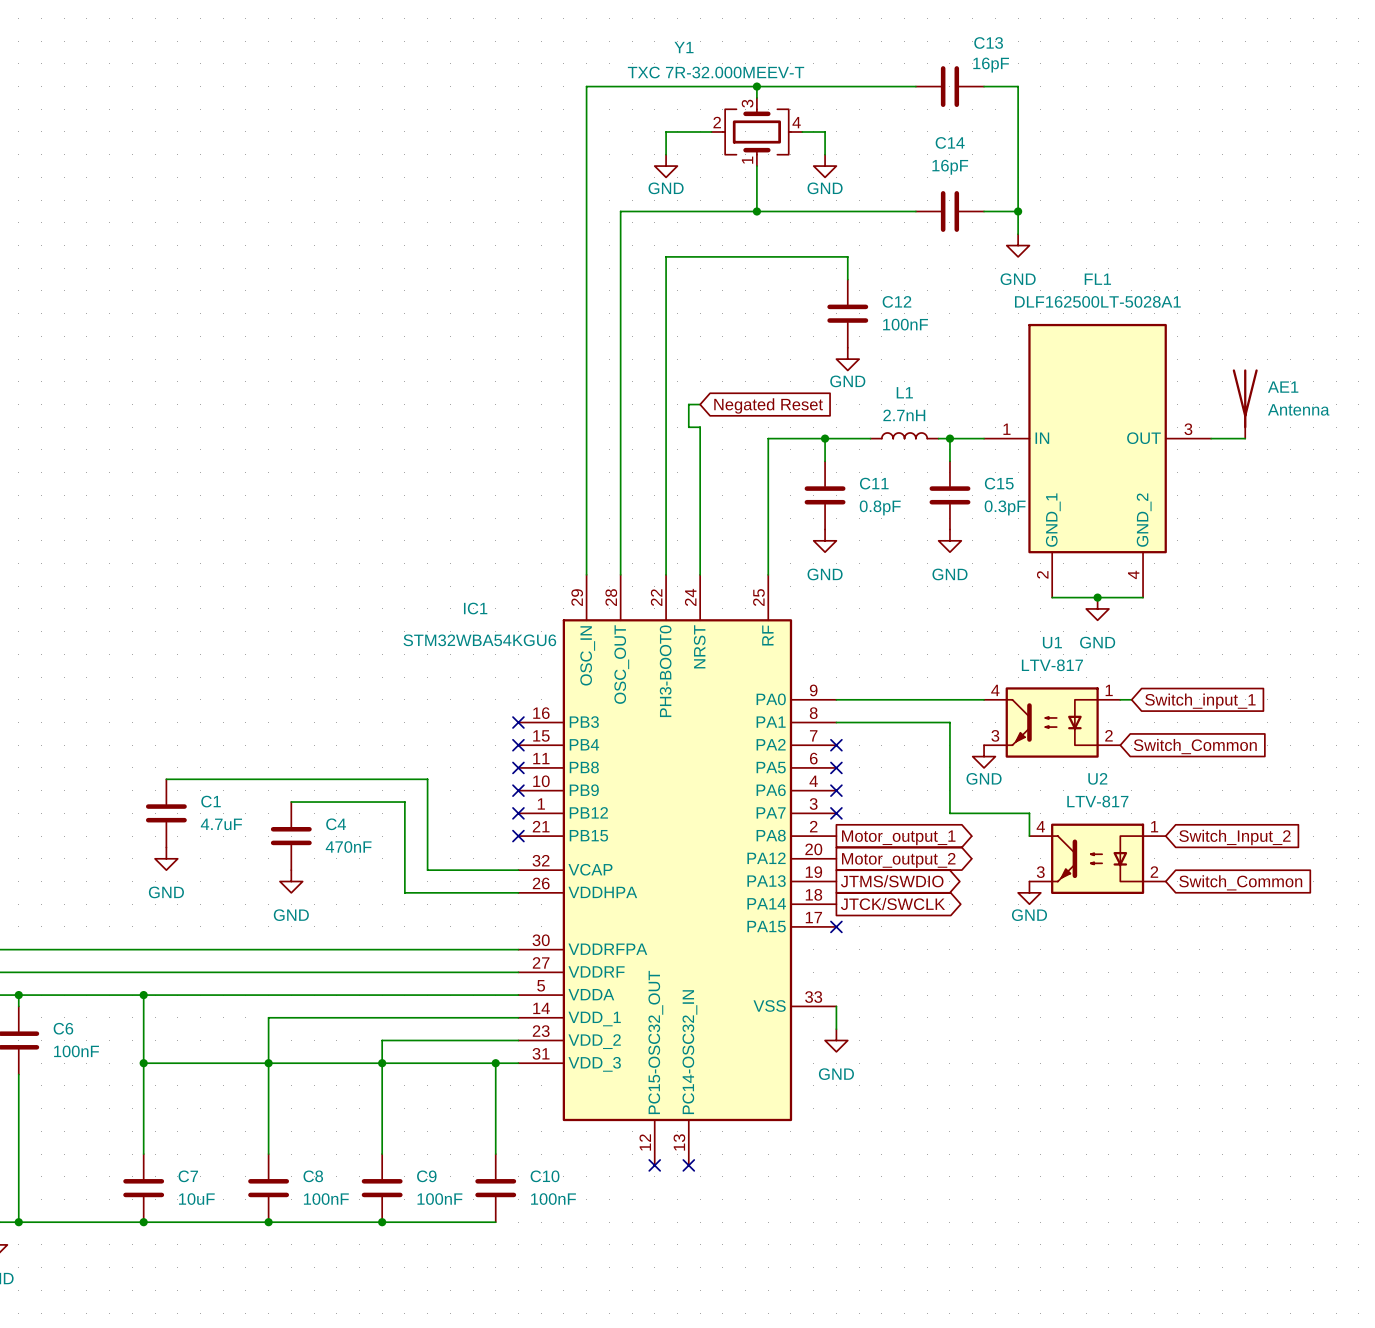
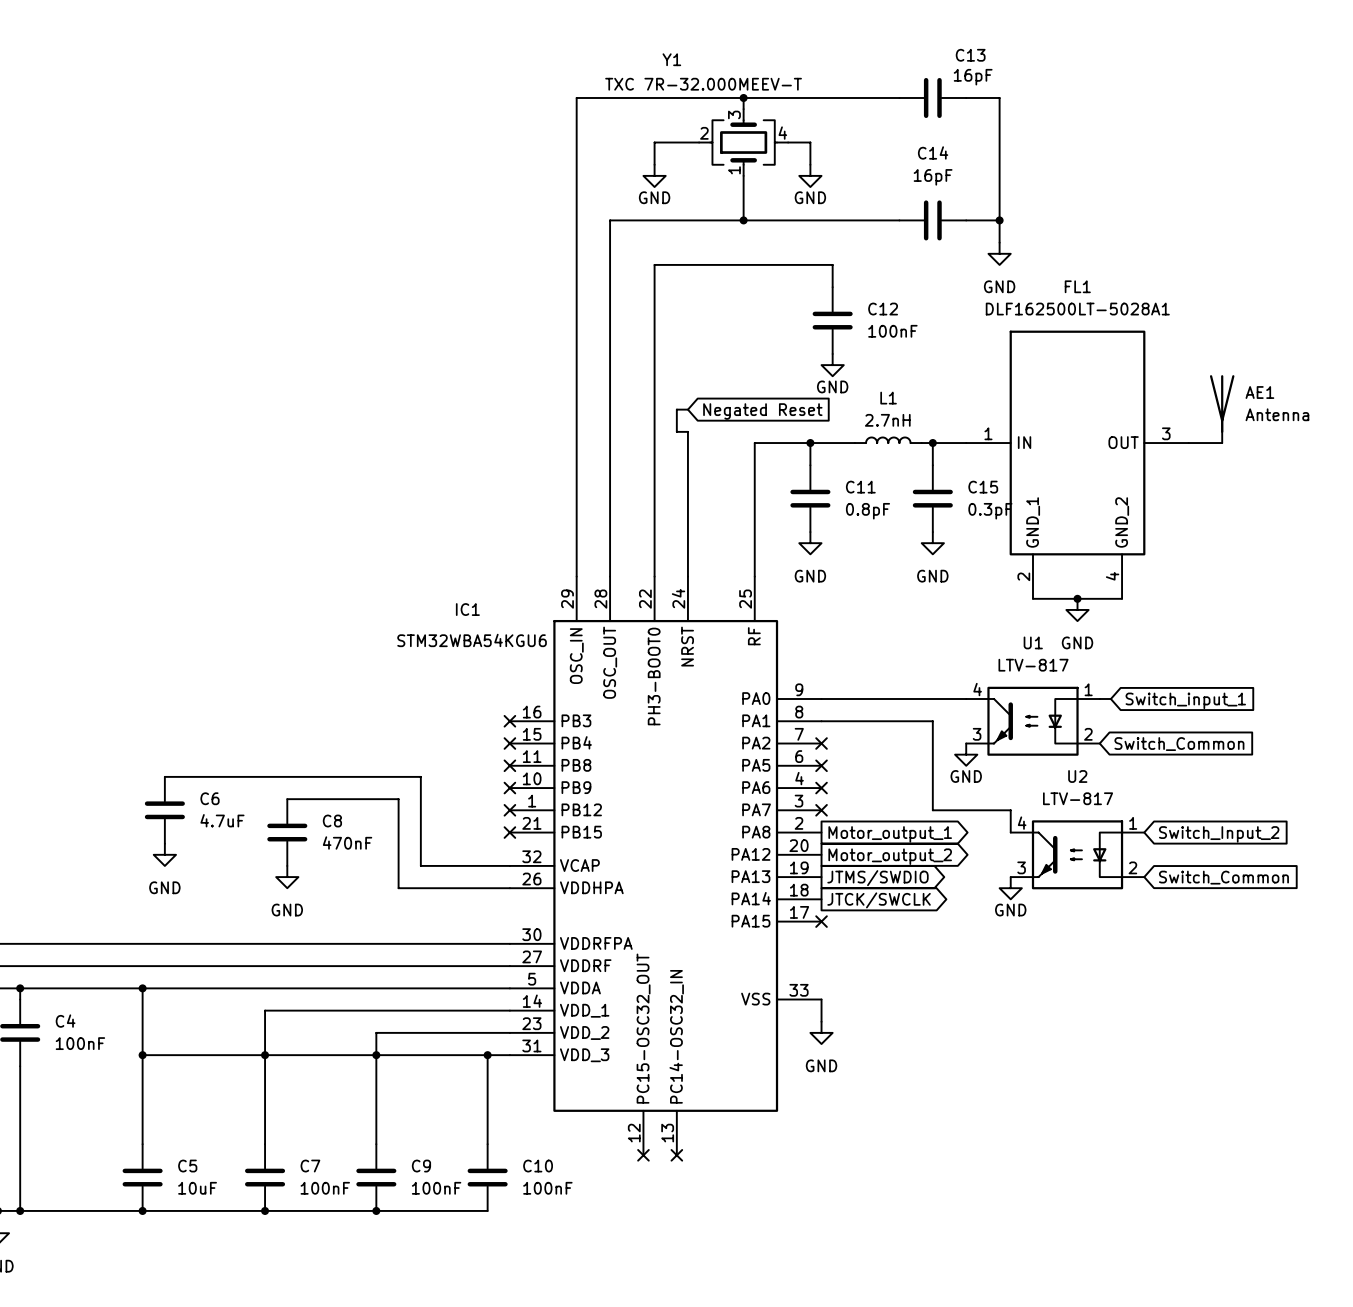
C1 name: C1 (211, 801) -> C6 (210, 798)
C4 name: C4 (336, 824) -> C8 (332, 821)
C6 name: C6 (63, 1028) -> C4 (65, 1021)
C7 name: C7 (188, 1176) -> C5 (187, 1166)
C8 name: C8 (313, 1176) -> C7 (310, 1166)

